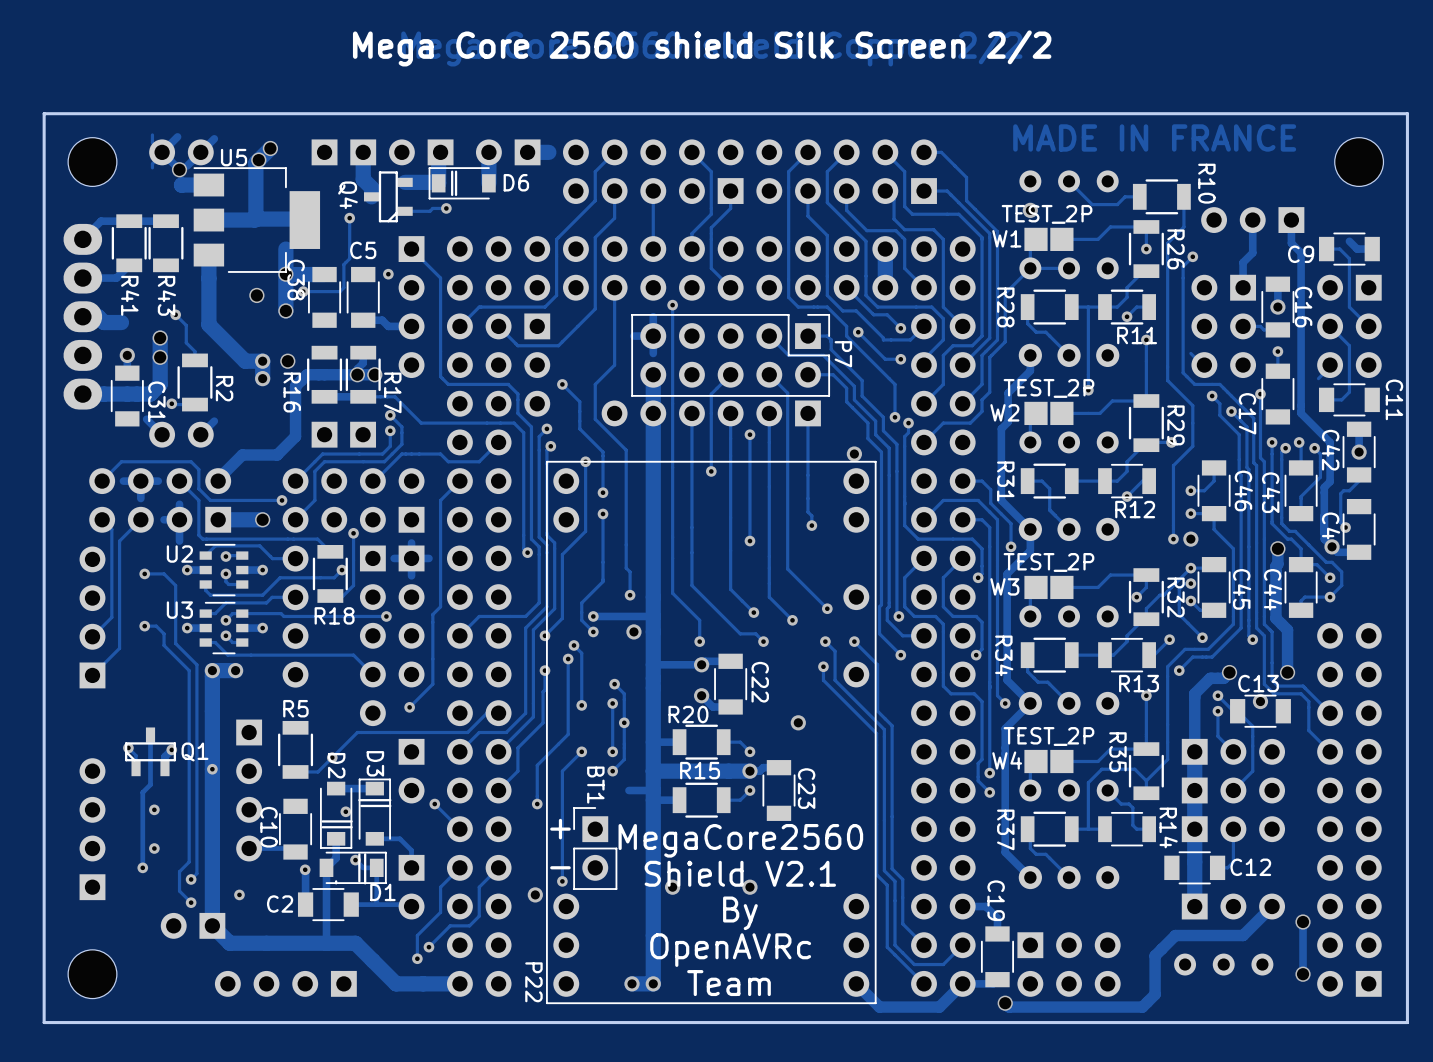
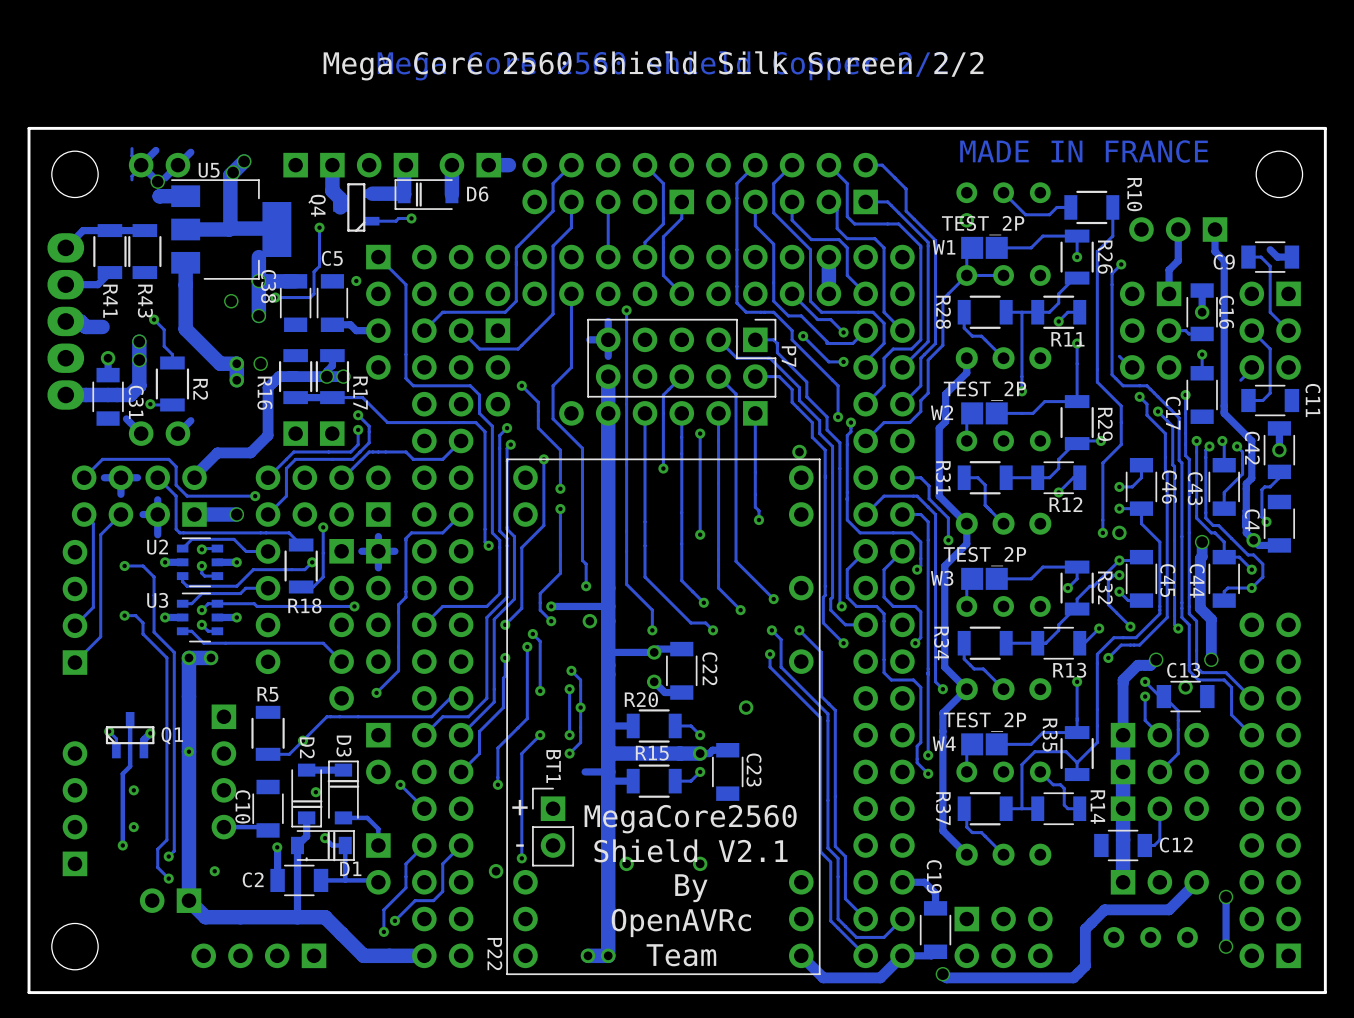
track: (459, 481) (440, 500) (440, 544) -> (461, 514) (442, 532) (411, 532) (405, 538)

